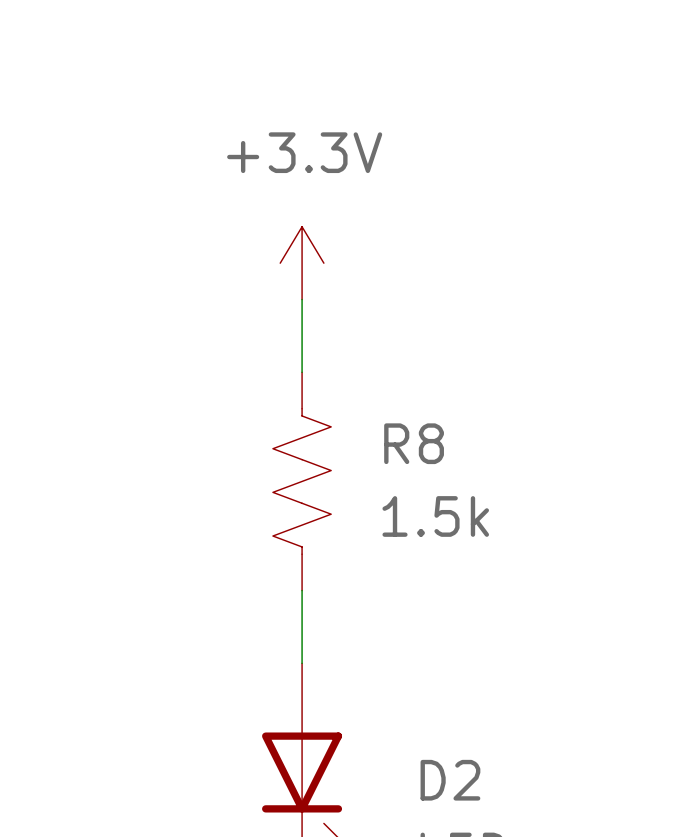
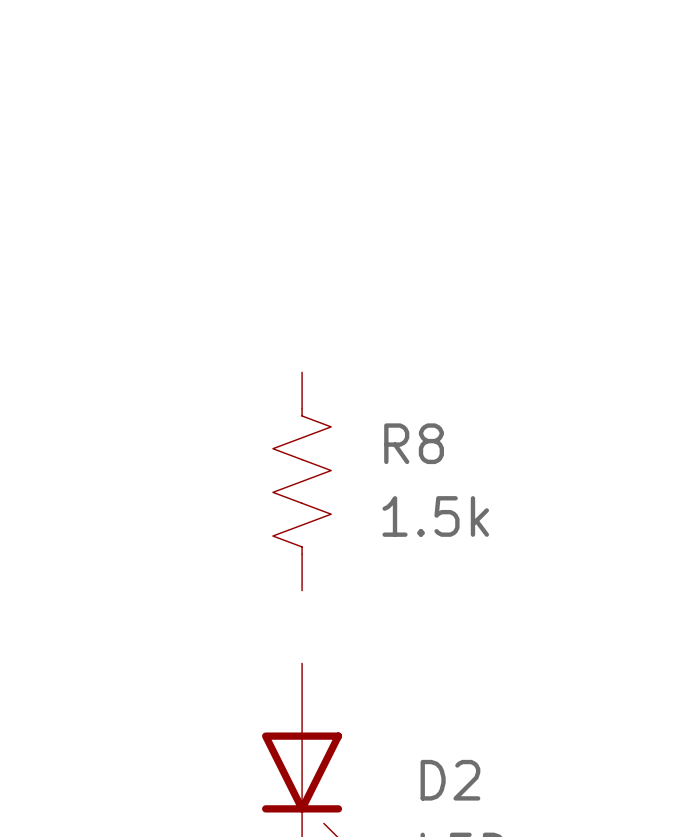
power symbol: +3.3V (302, 263) -> none
wire: (302, 299) (302, 372) -> none
wire: (302, 590) (302, 663) -> none

